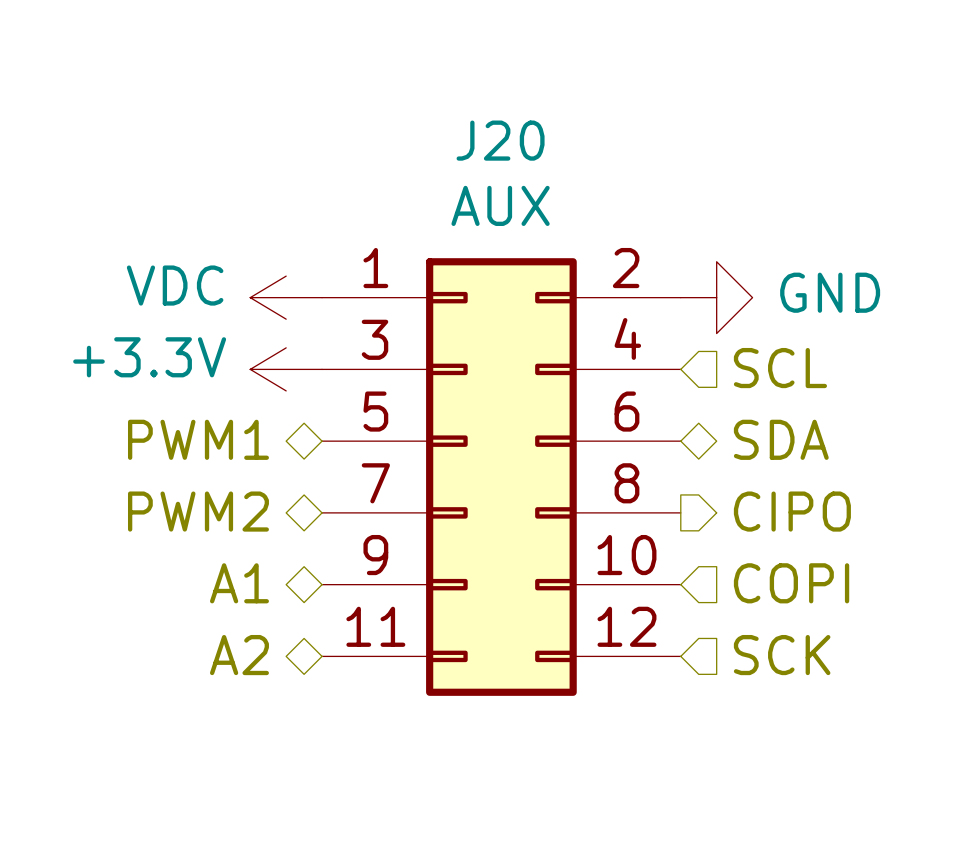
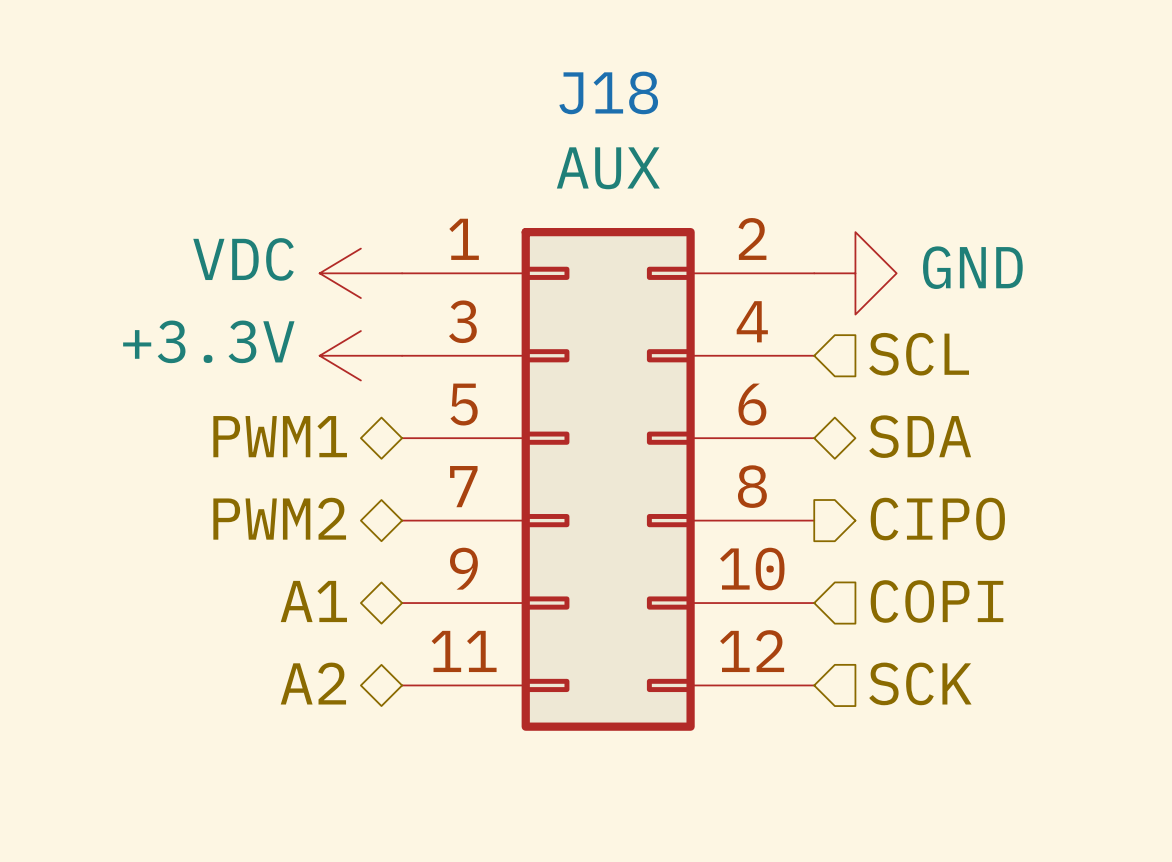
J20 name: J20 (500, 140) -> J18 (608, 92)

